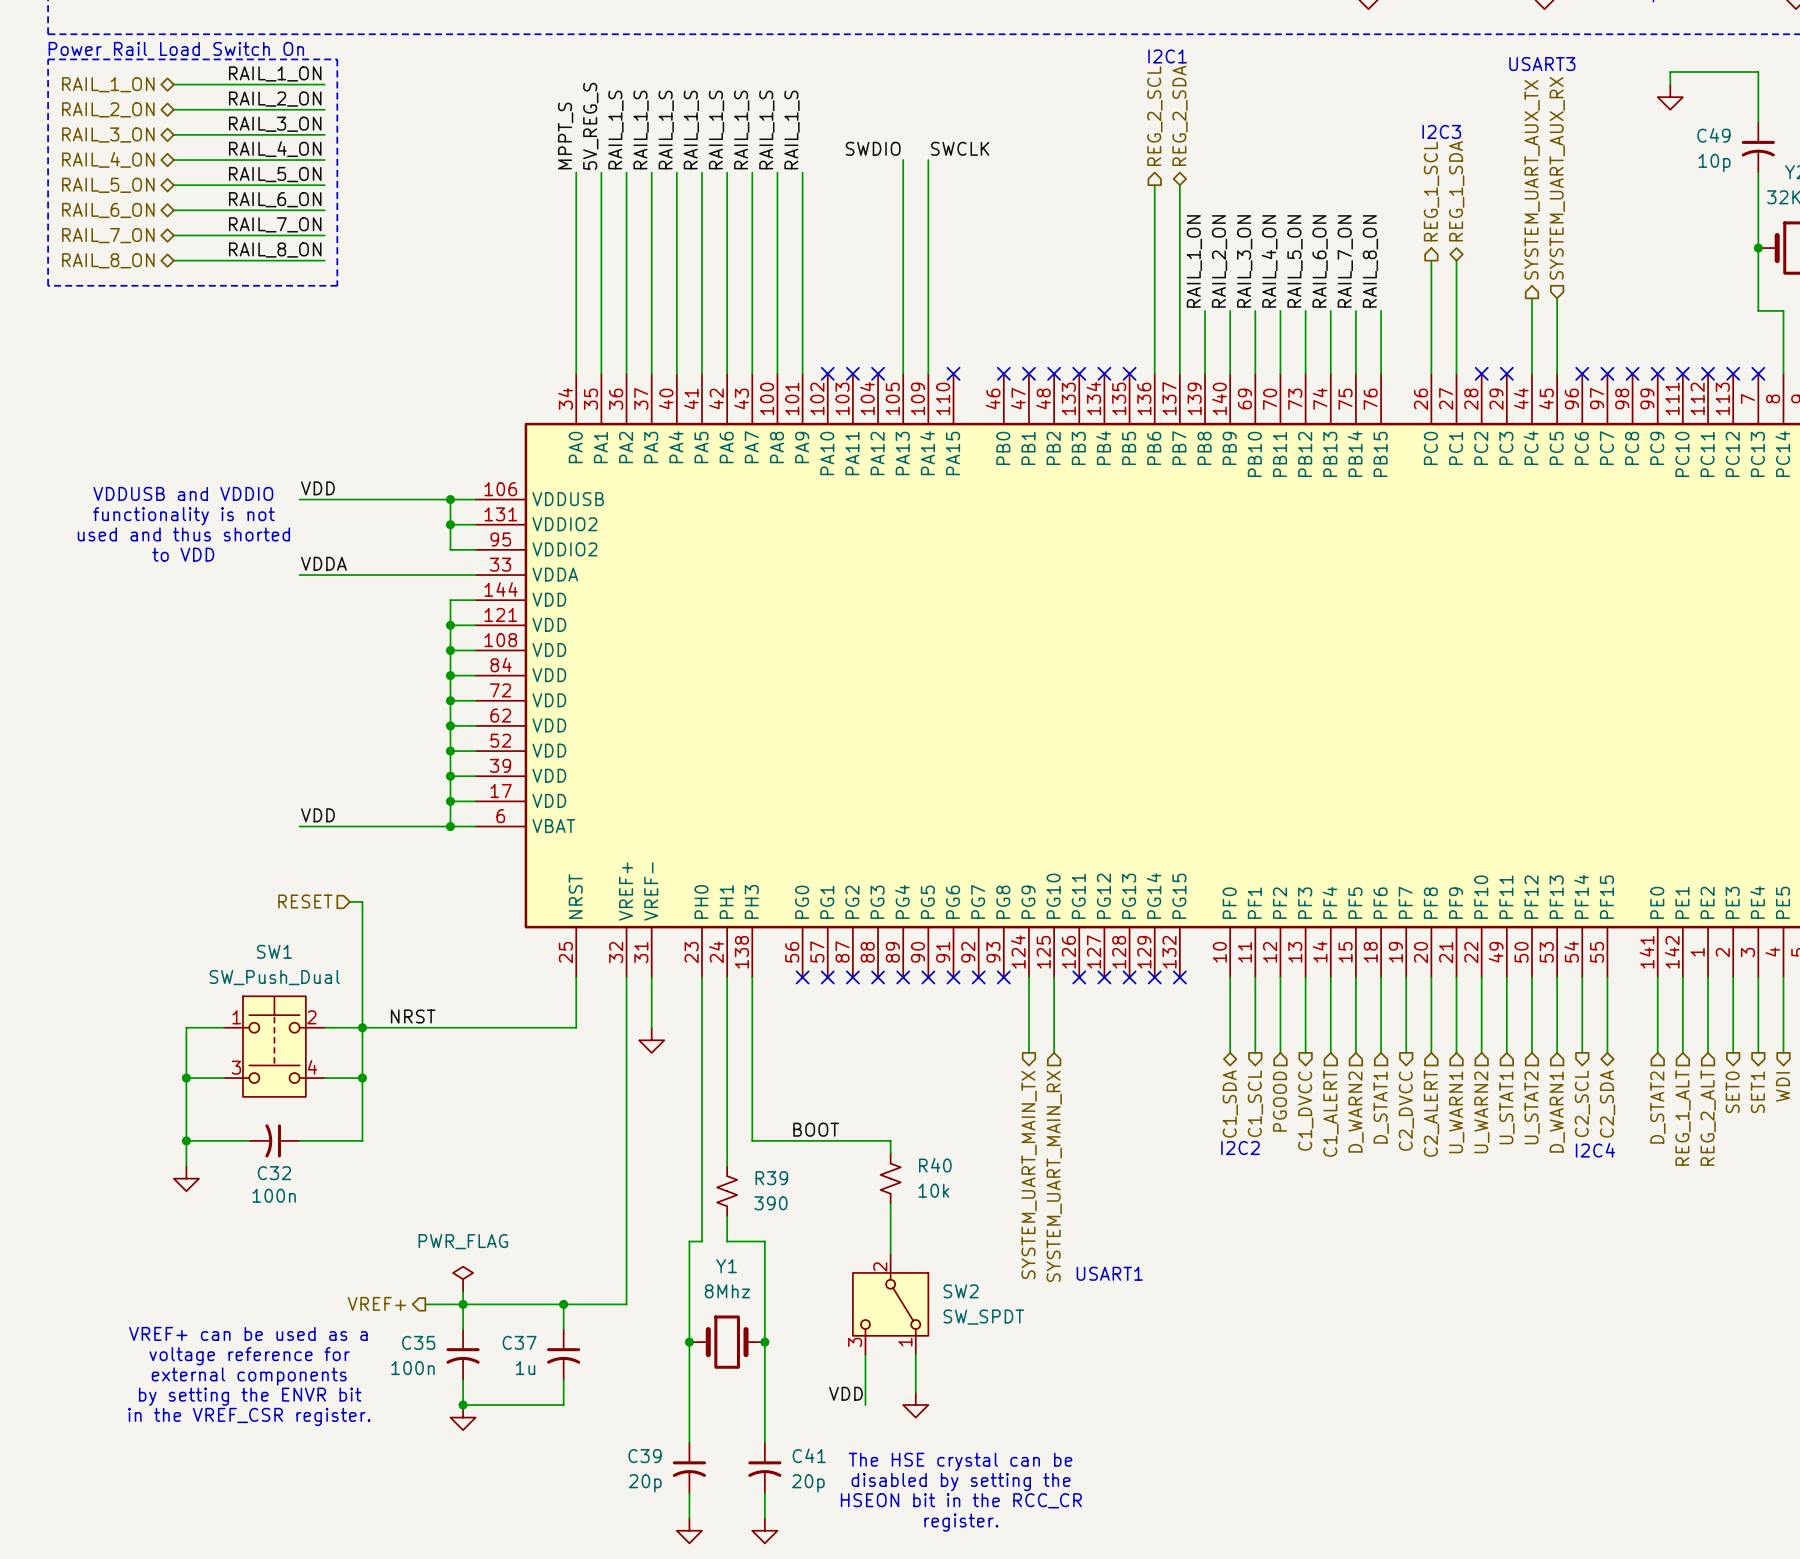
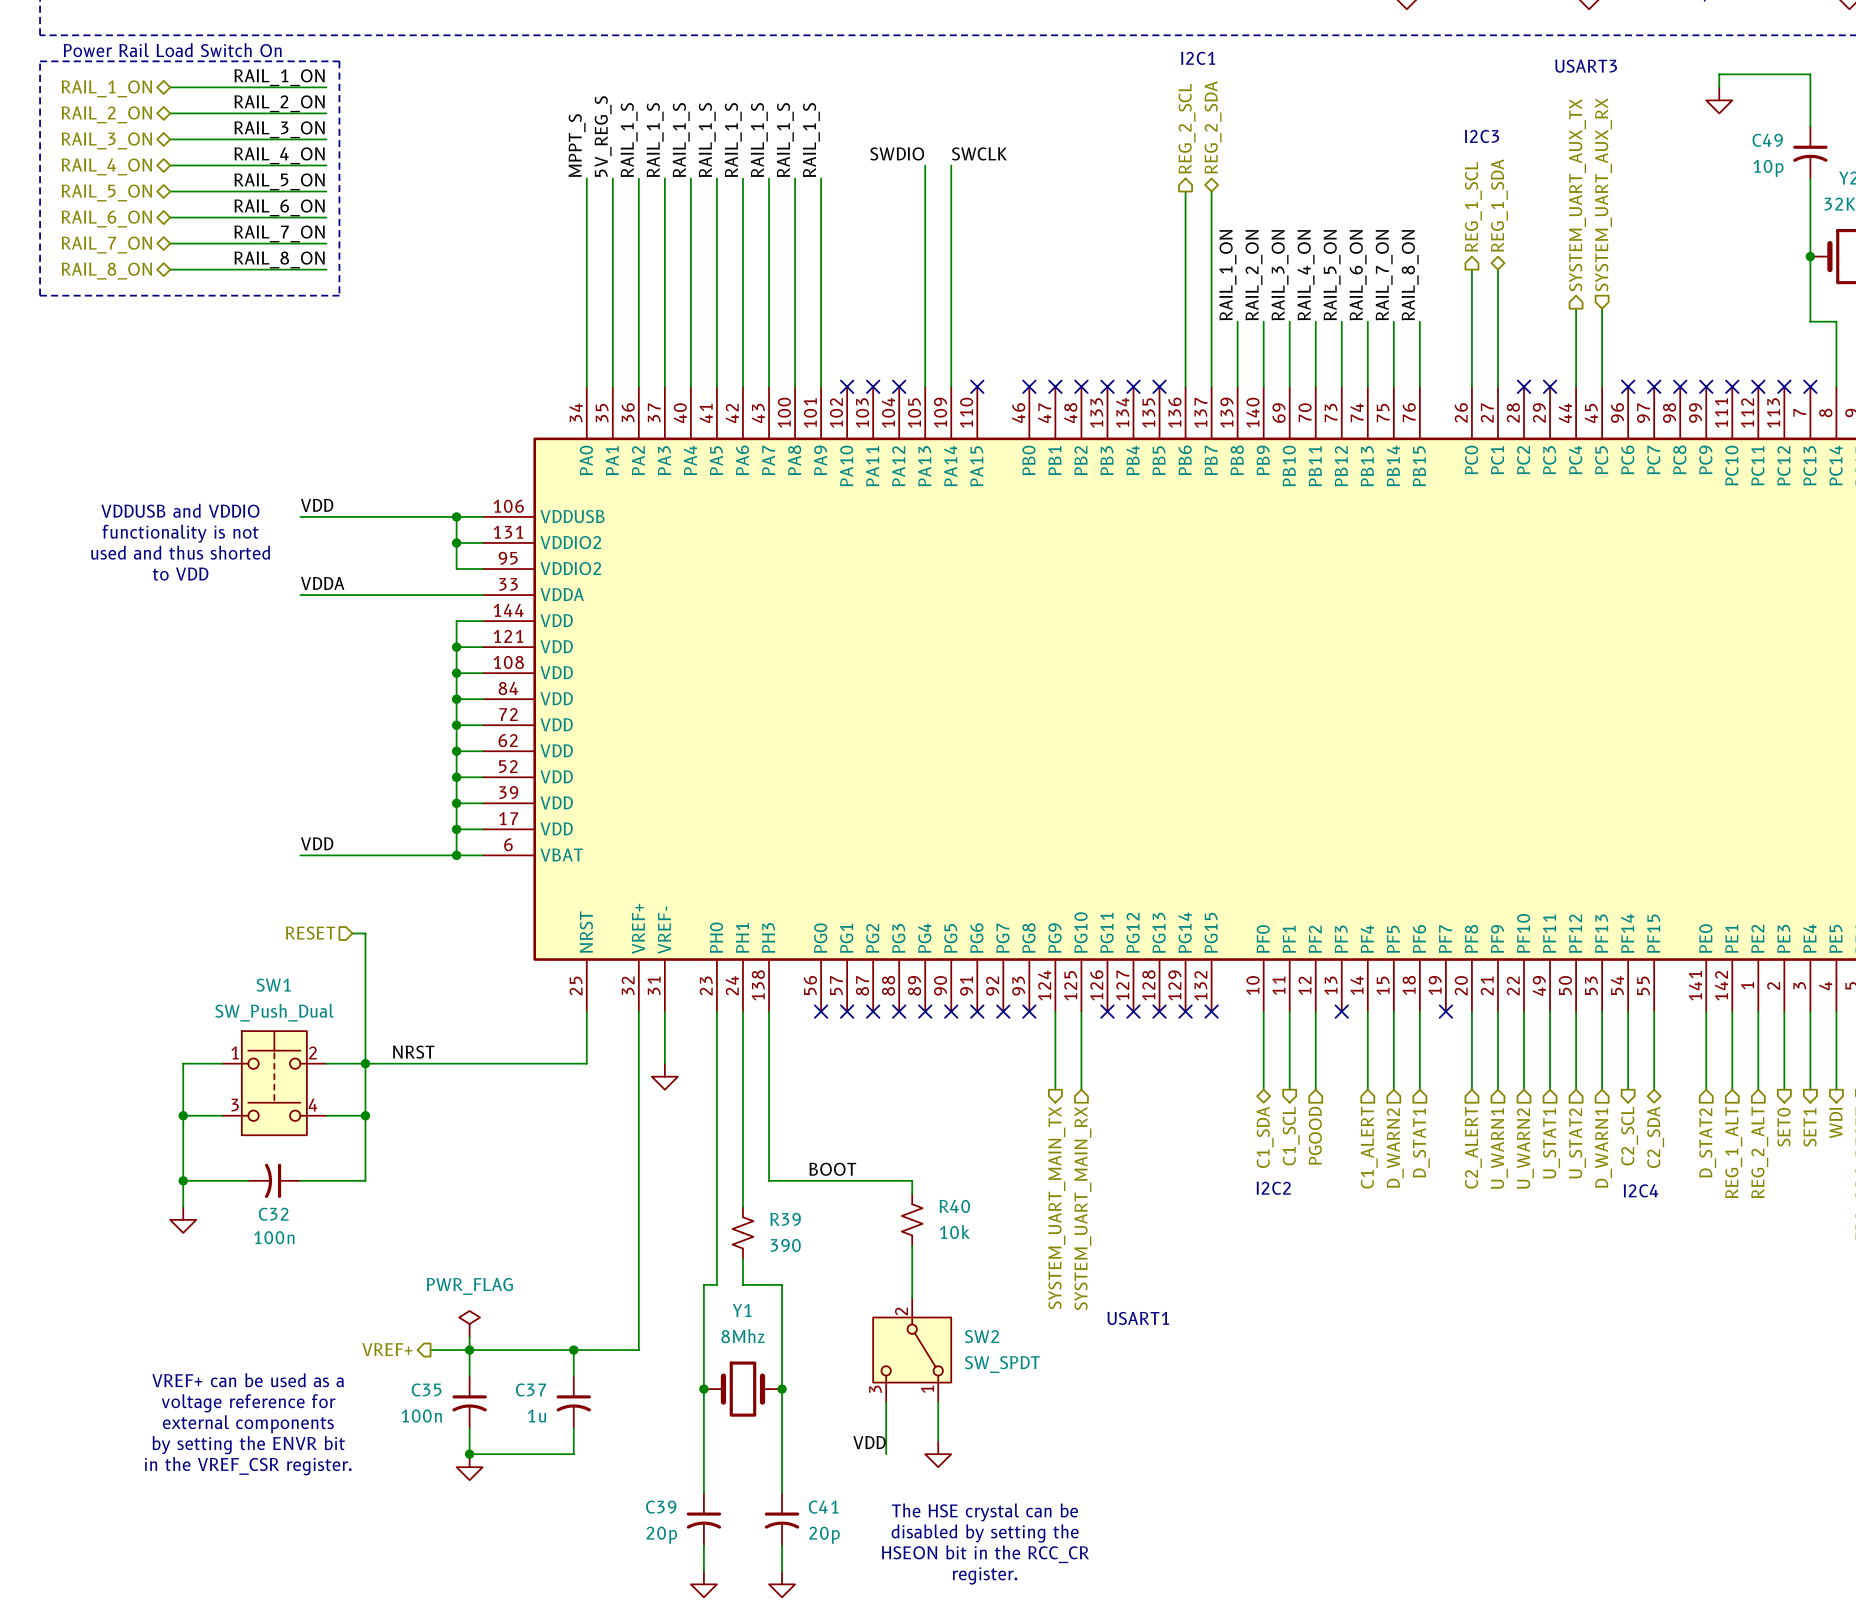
wire: (1305, 977) (1305, 1052) -> none
no-connect mark: none -> (1341, 1011)
wire: (1406, 977) (1406, 1052) -> none
no-connect mark: none -> (1445, 1011)
hierarchical label: C1_DVCC (1305, 1111) -> none
hierarchical label: C2_DVCC (1406, 1111) -> none

